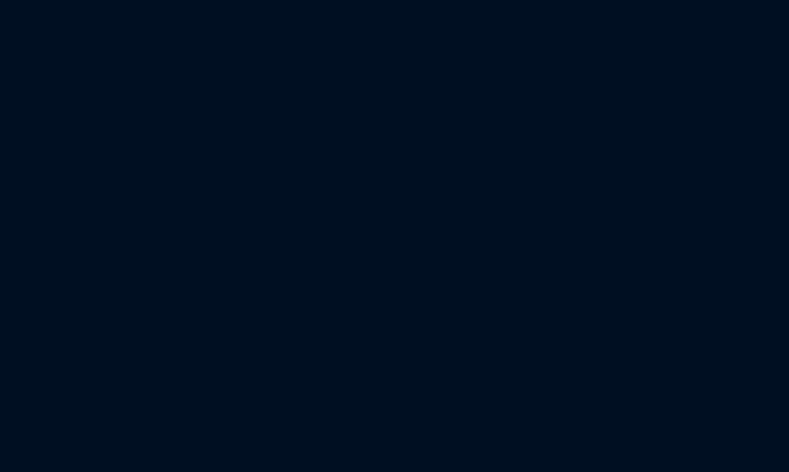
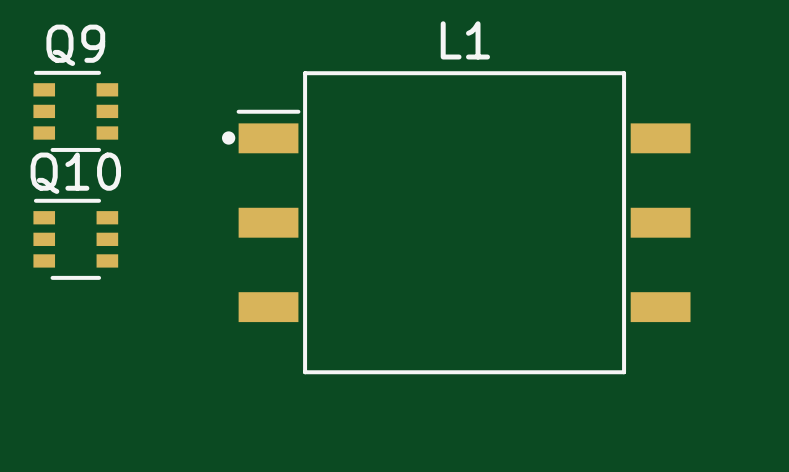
Q9: none -> (75, 111)
L1: none -> (456, 222)
Q10: none -> (75, 239)

